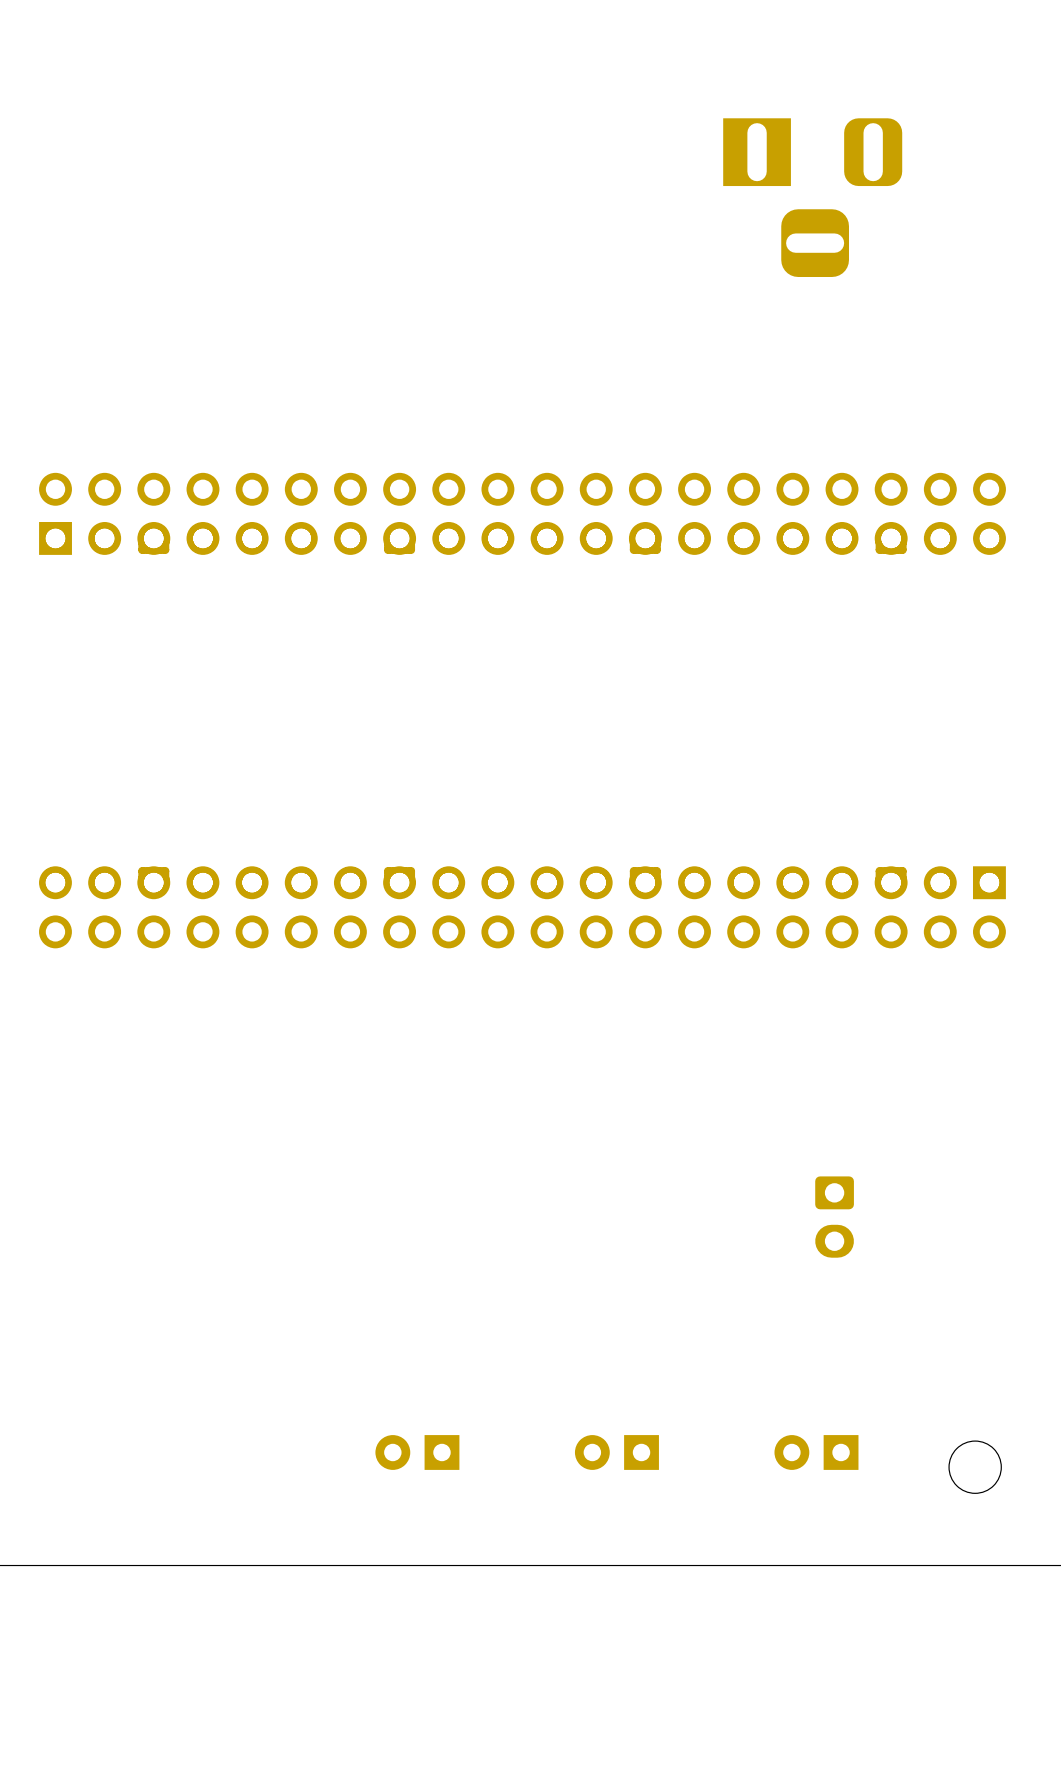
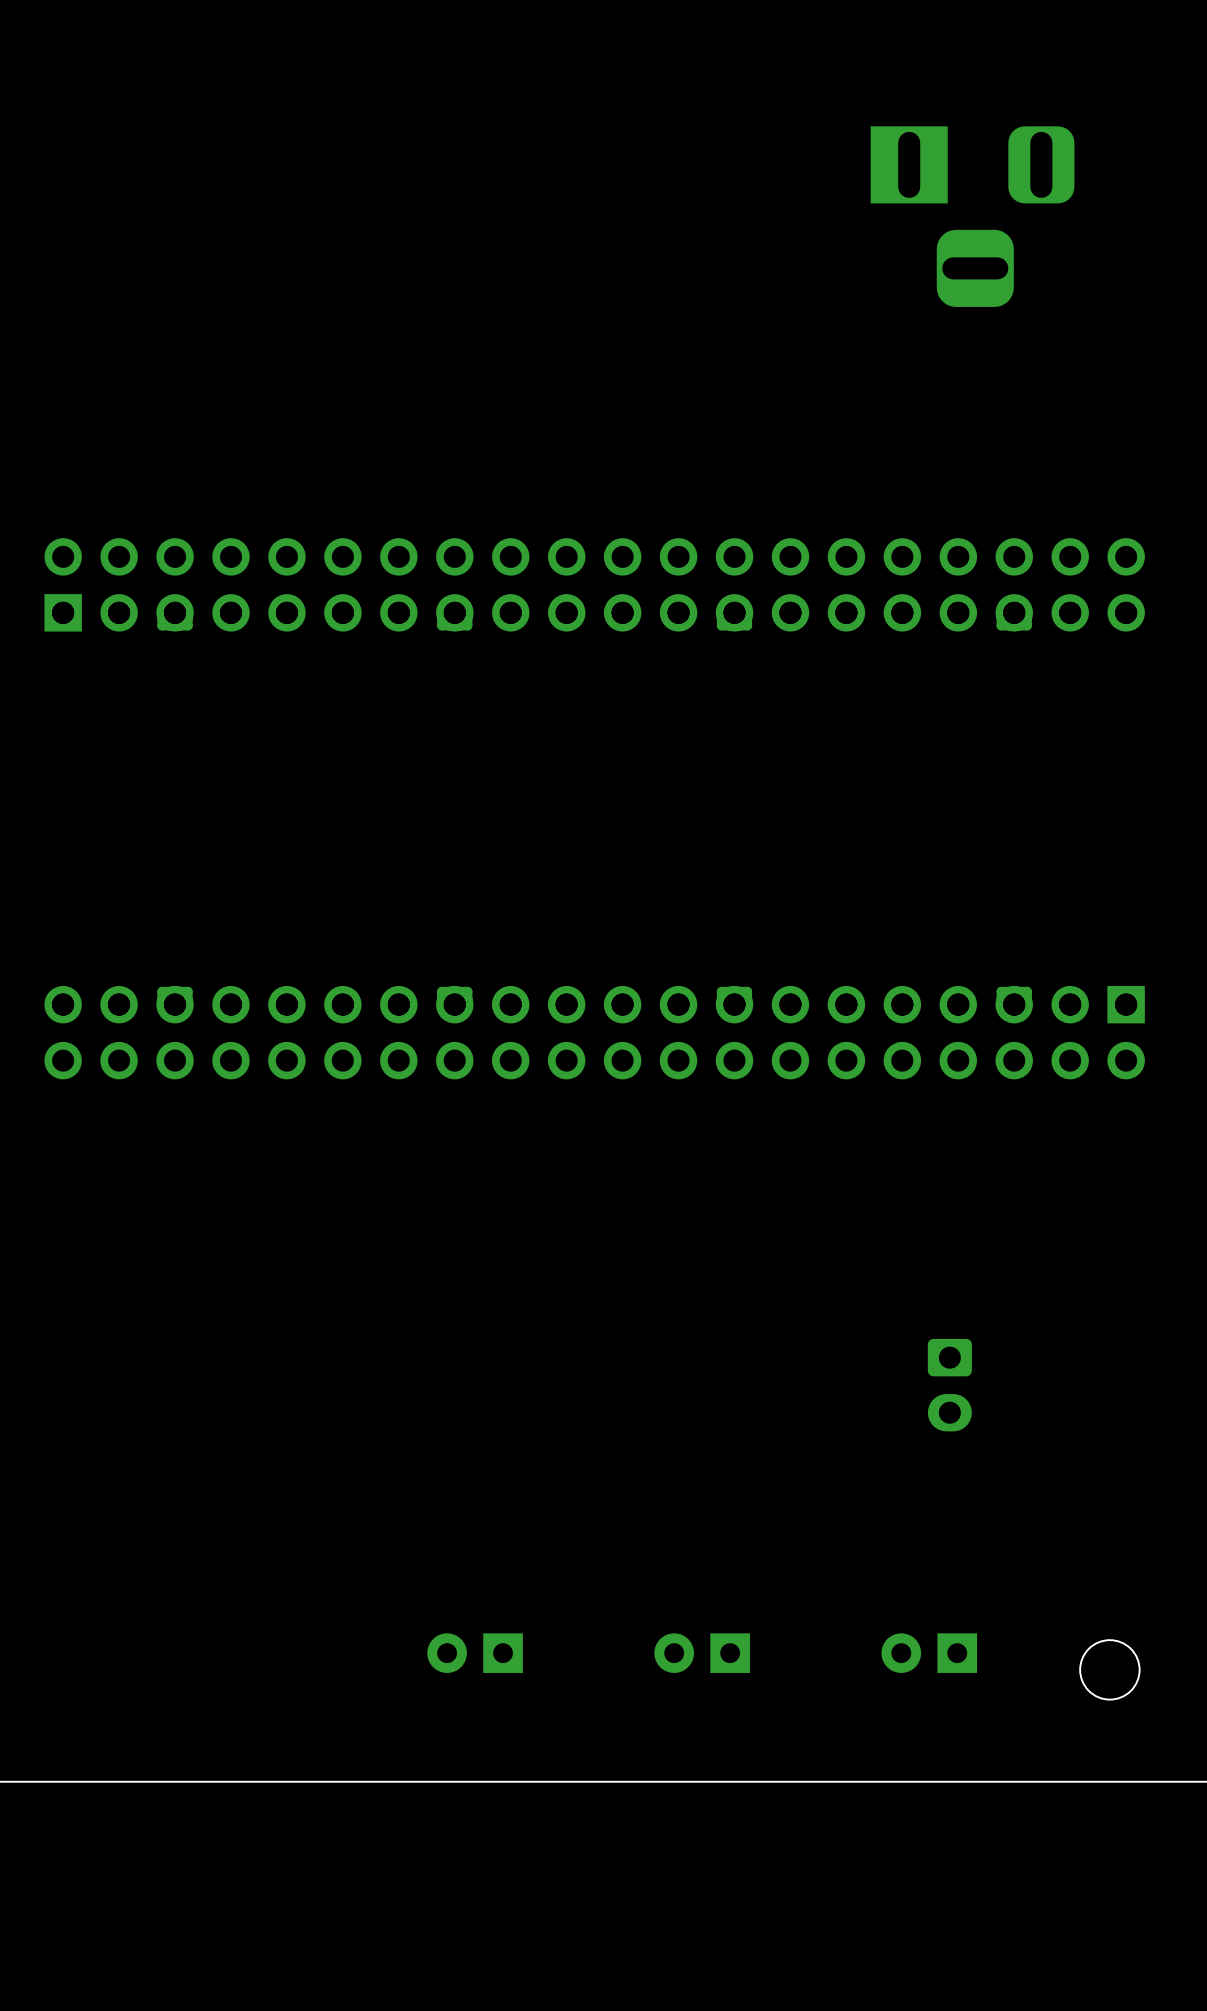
part position: (812, 197) -> (972, 216)

